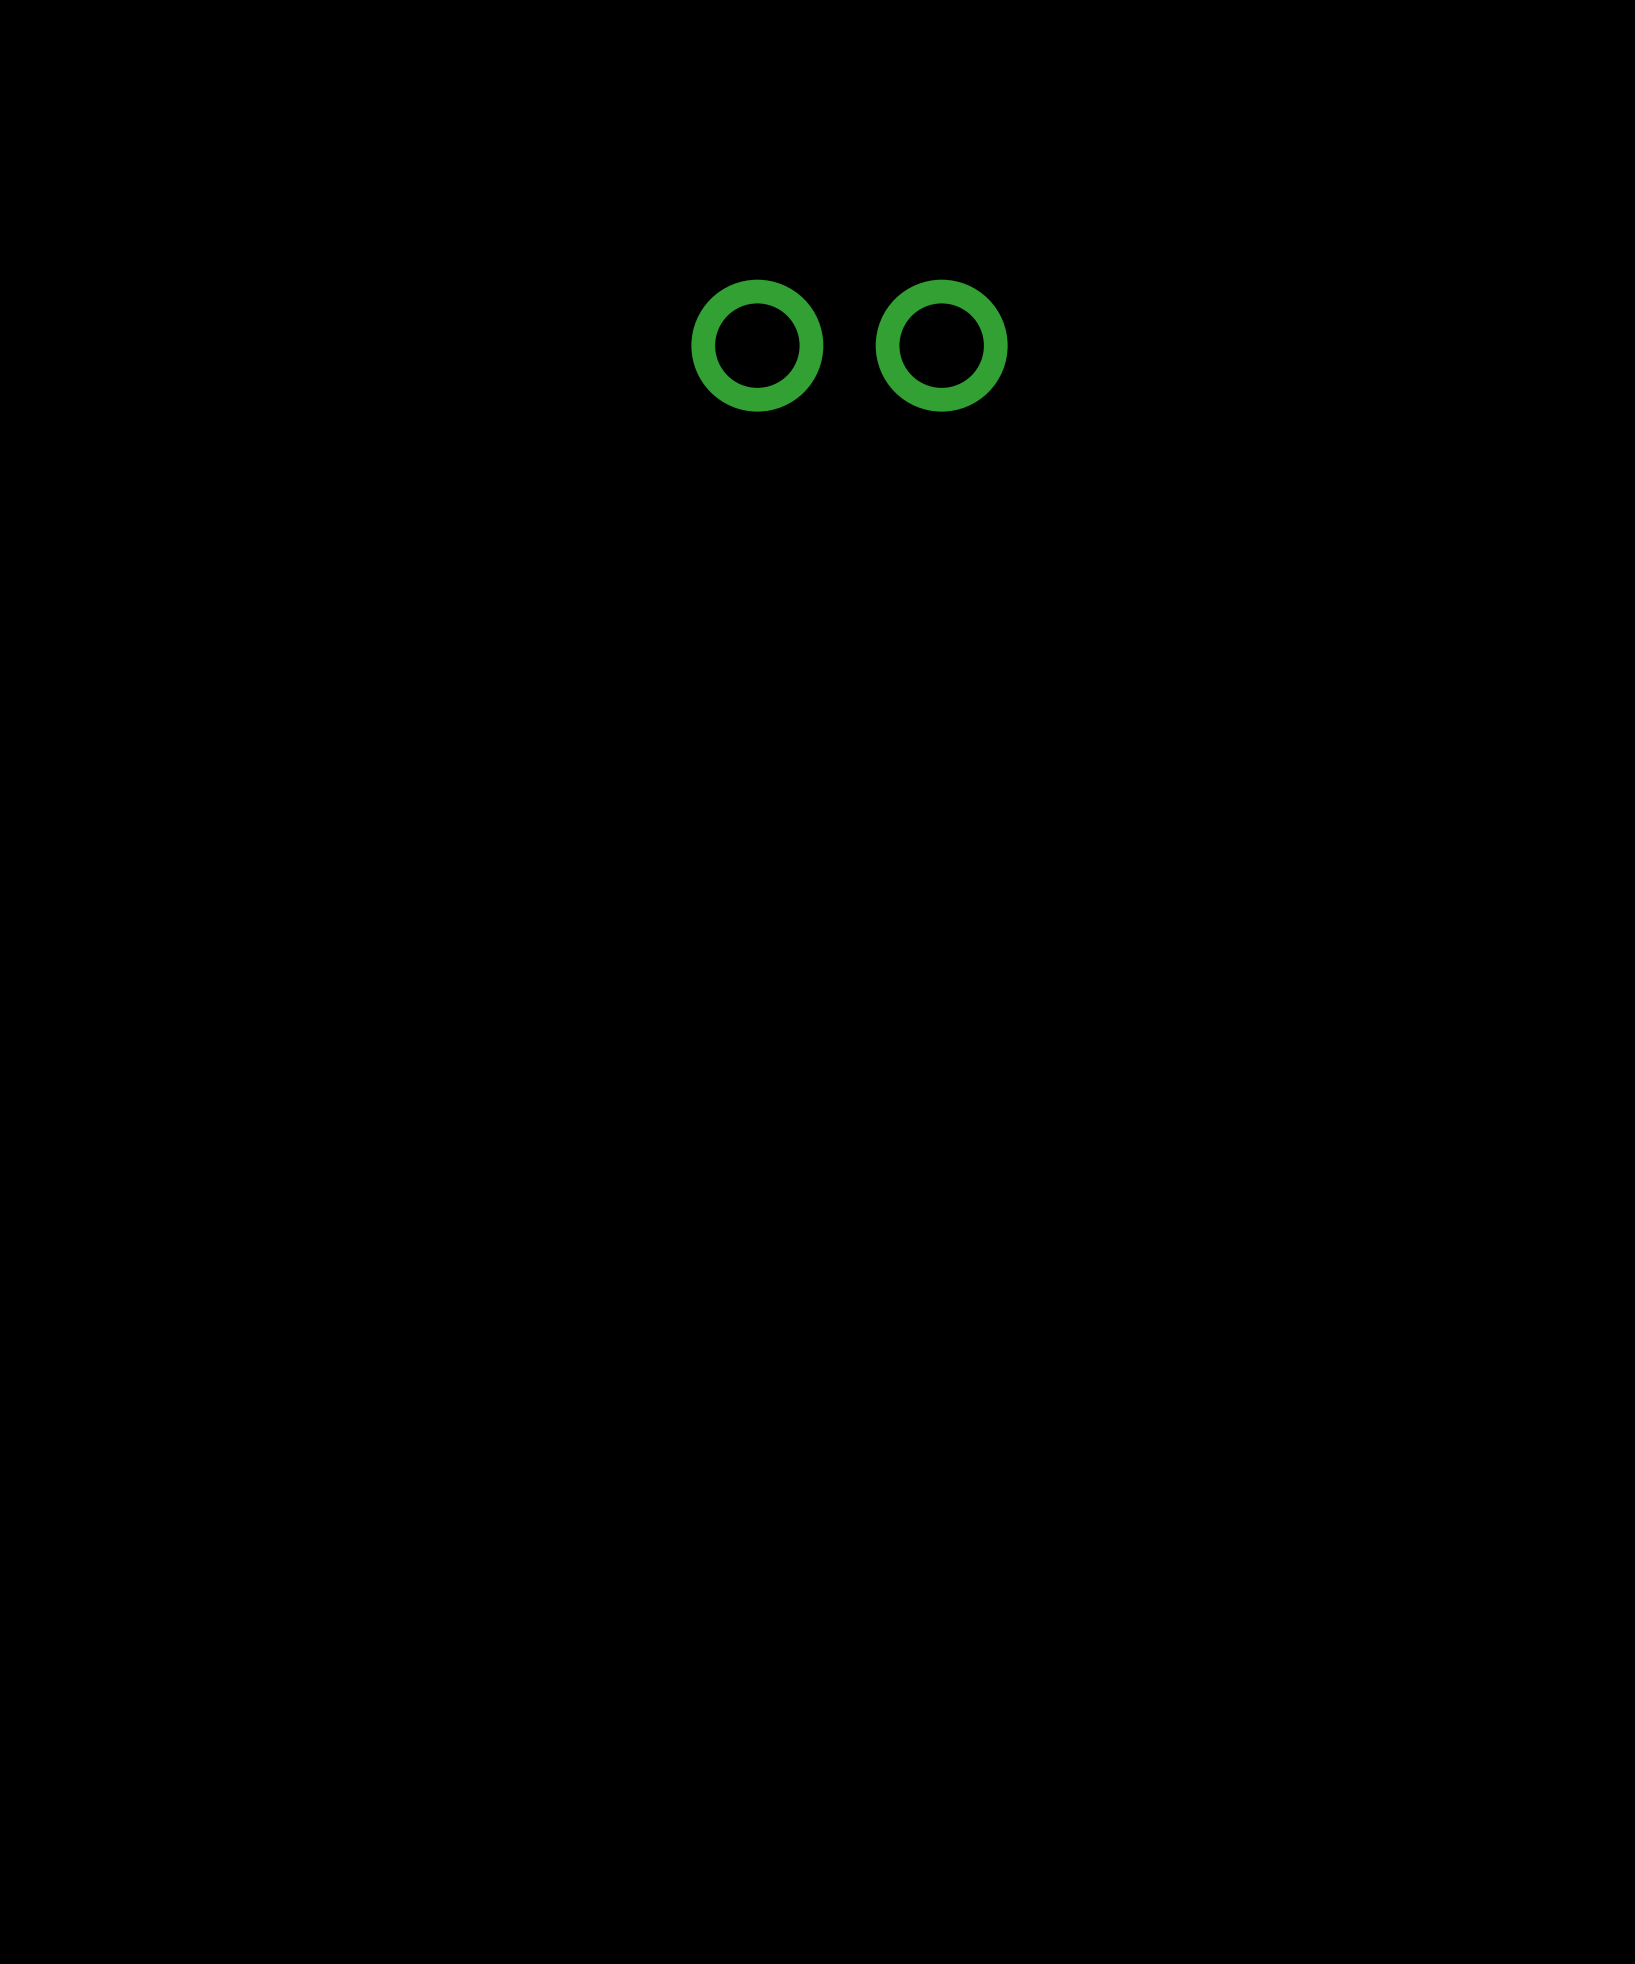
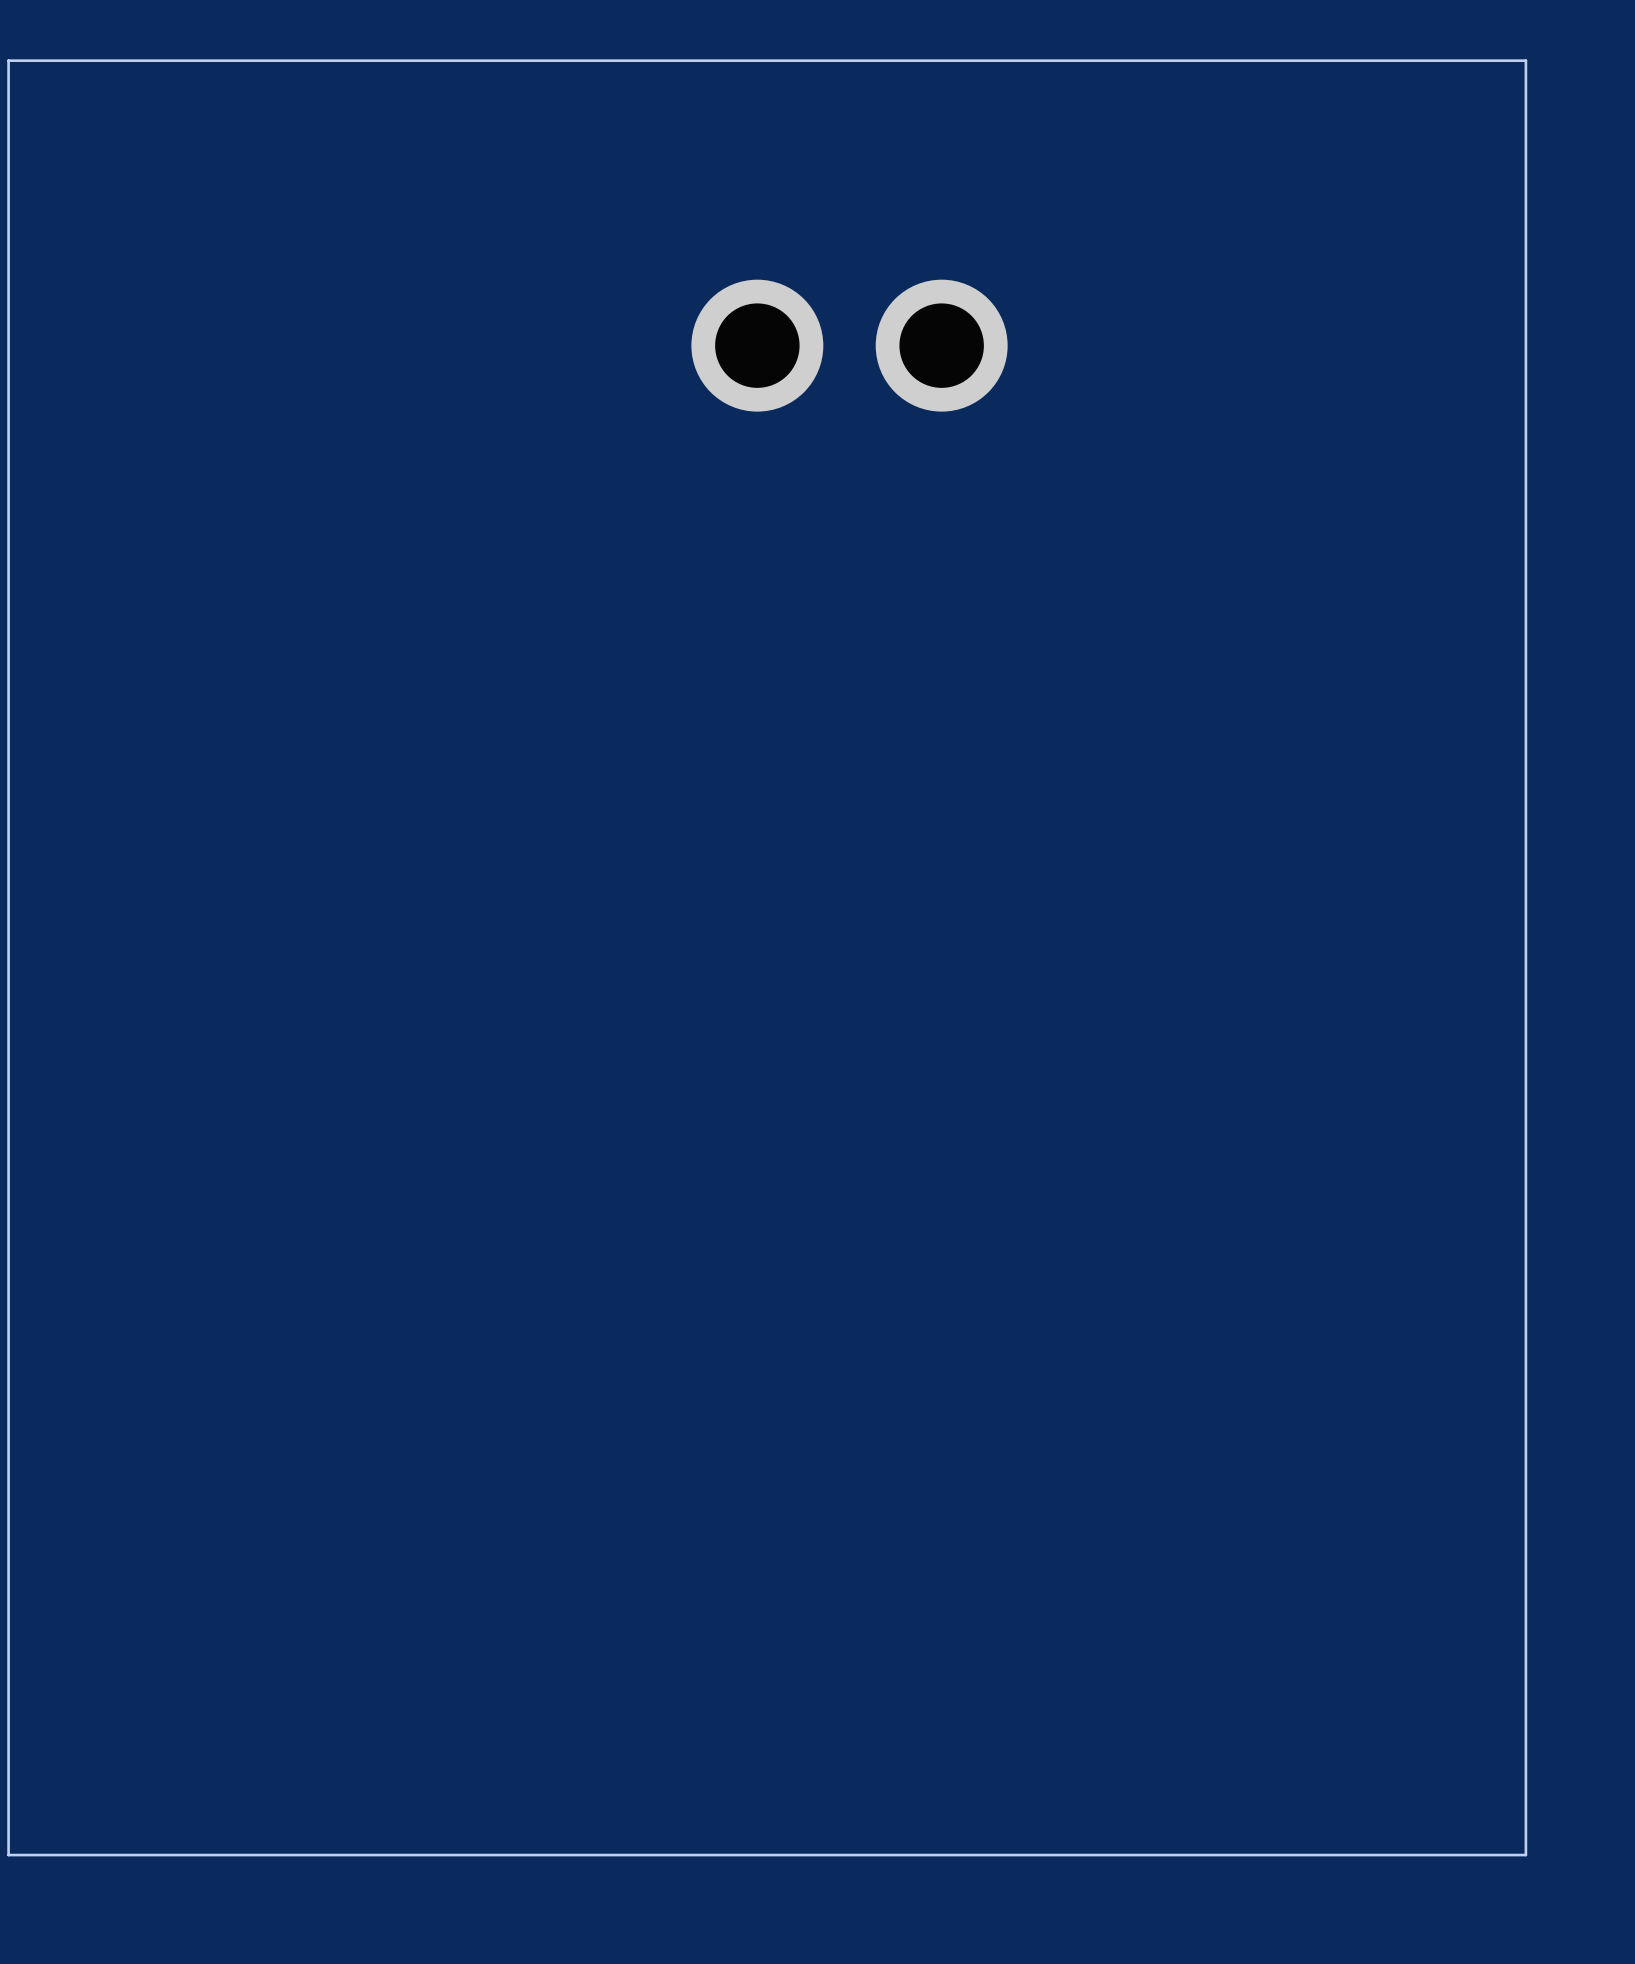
board edge: none -> (1525, 60) (8, 60) (8, 1855) (1525, 1855) (1525, 60)

